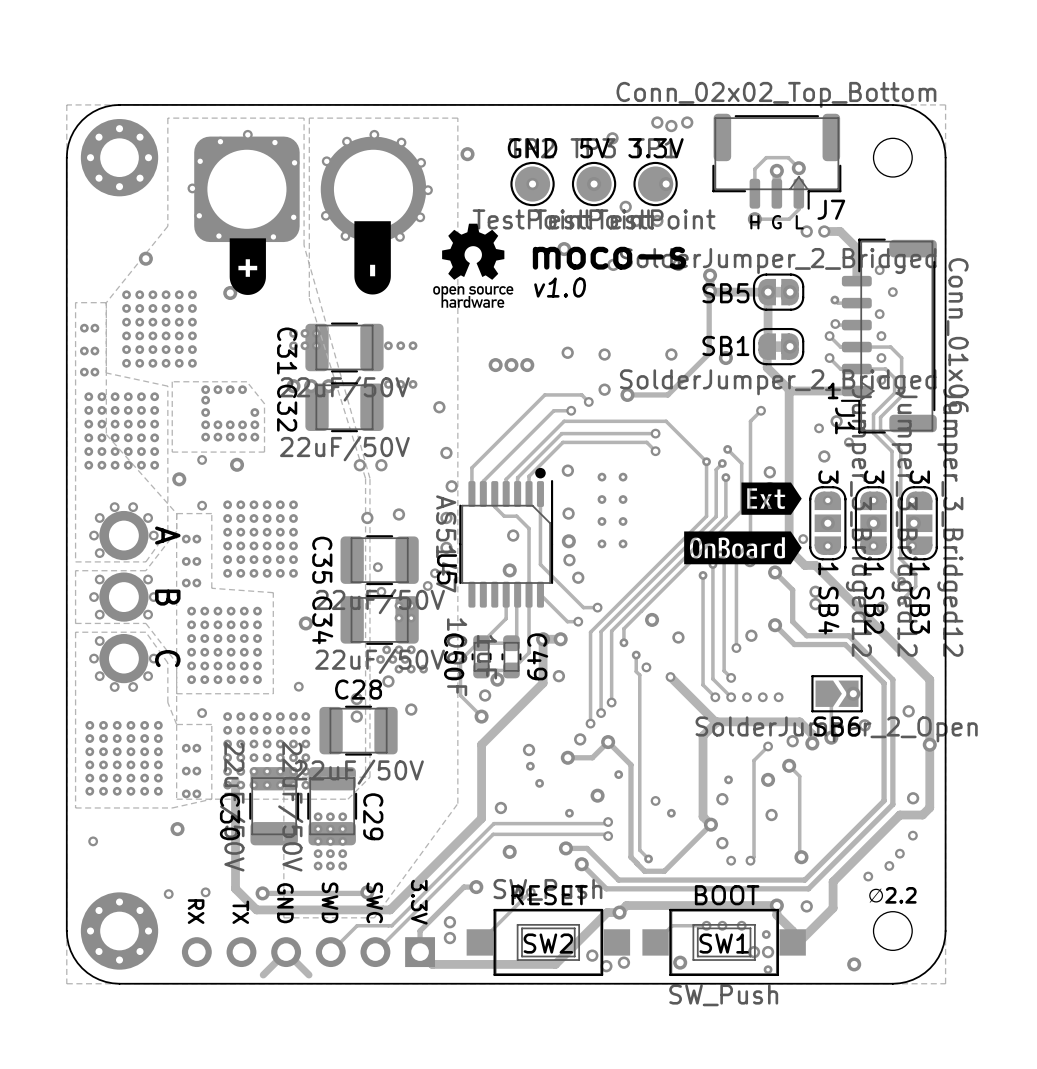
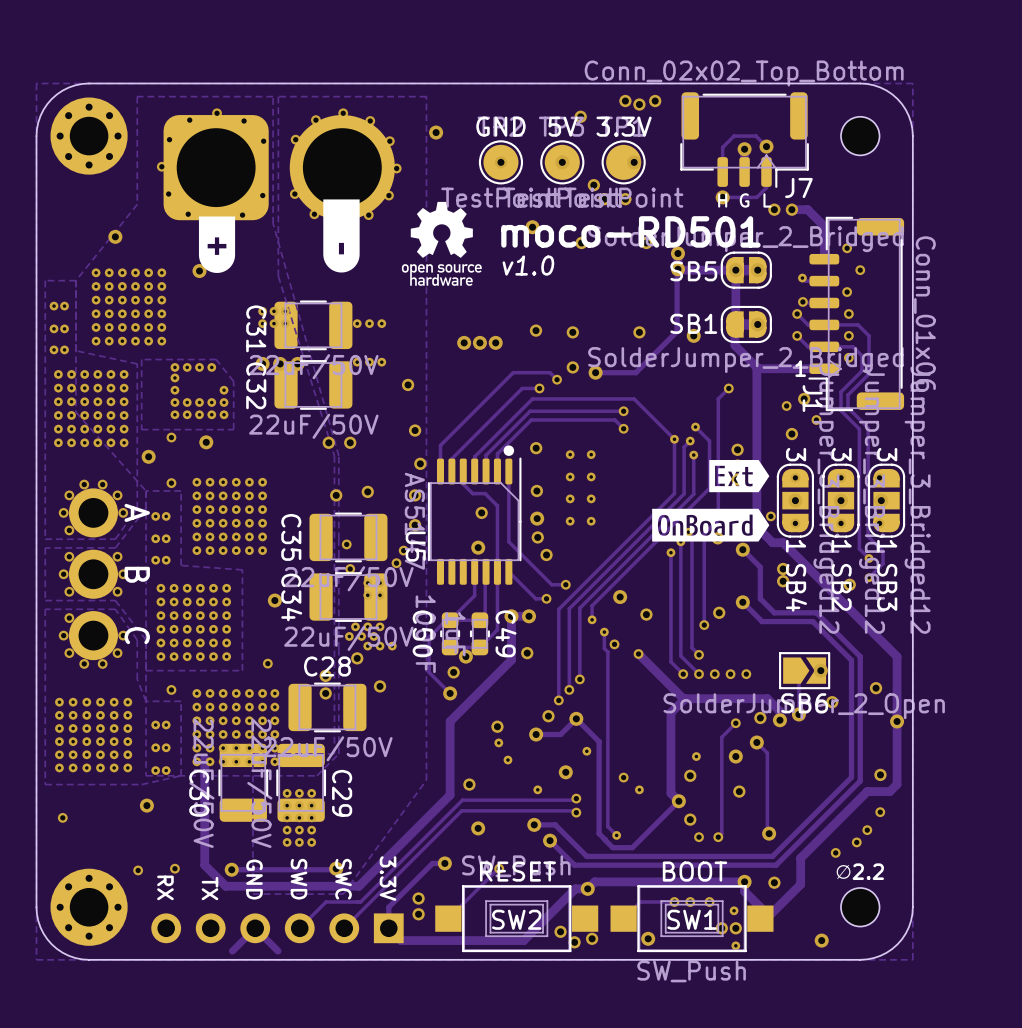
text: moco-s (609, 258) -> moco-RD501 (630, 231)

